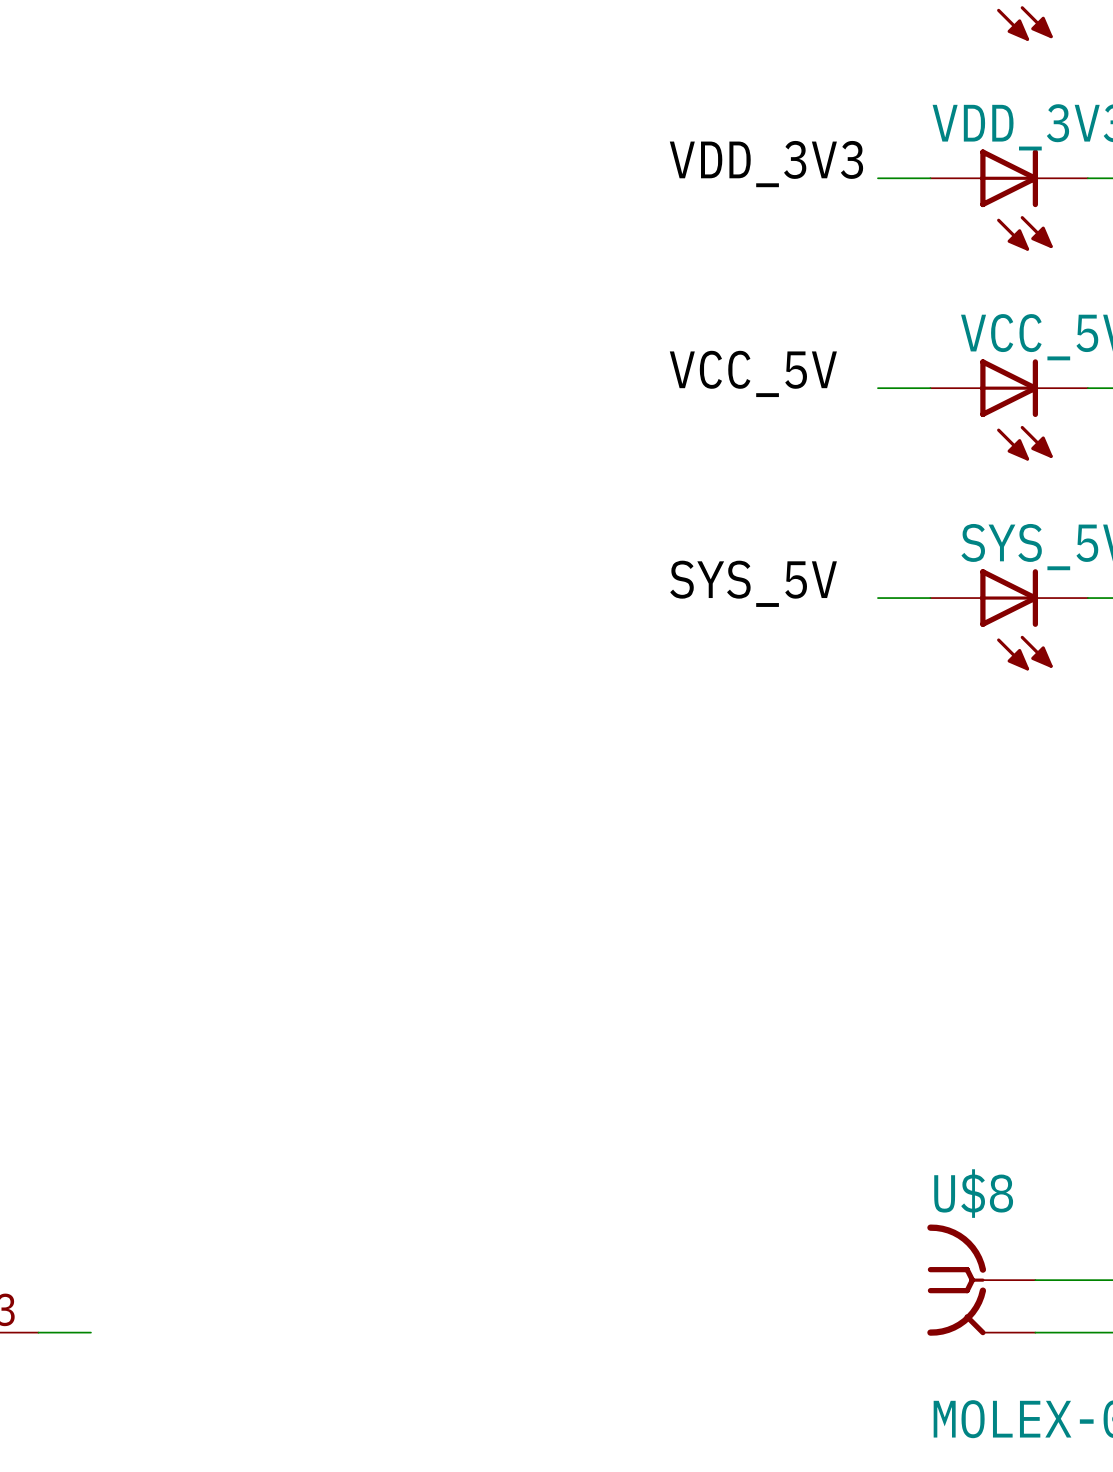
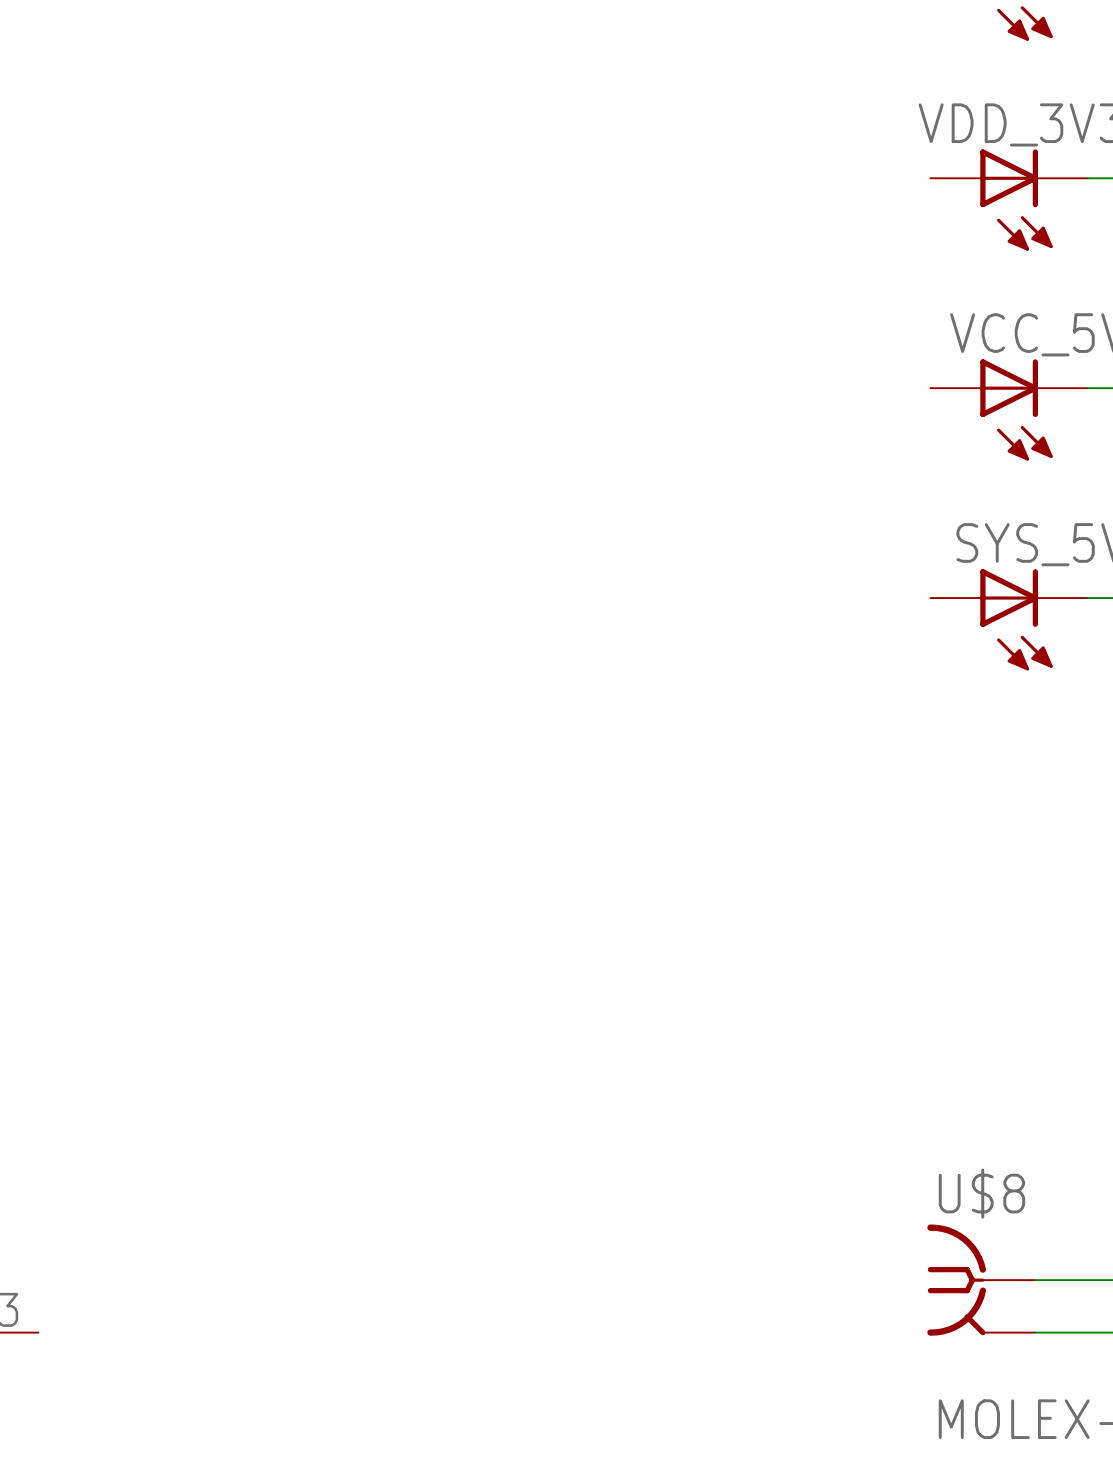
label: VDD_3V3 (766, 164) -> none
wire: (877, 178) (930, 178) -> none
label: VCC_5V (753, 373) -> none
wire: (877, 388) (930, 388) -> none
label: SYS_5V (753, 583) -> none
wire: (877, 598) (930, 598) -> none
wire: (38, 1332) (90, 1332) -> none

